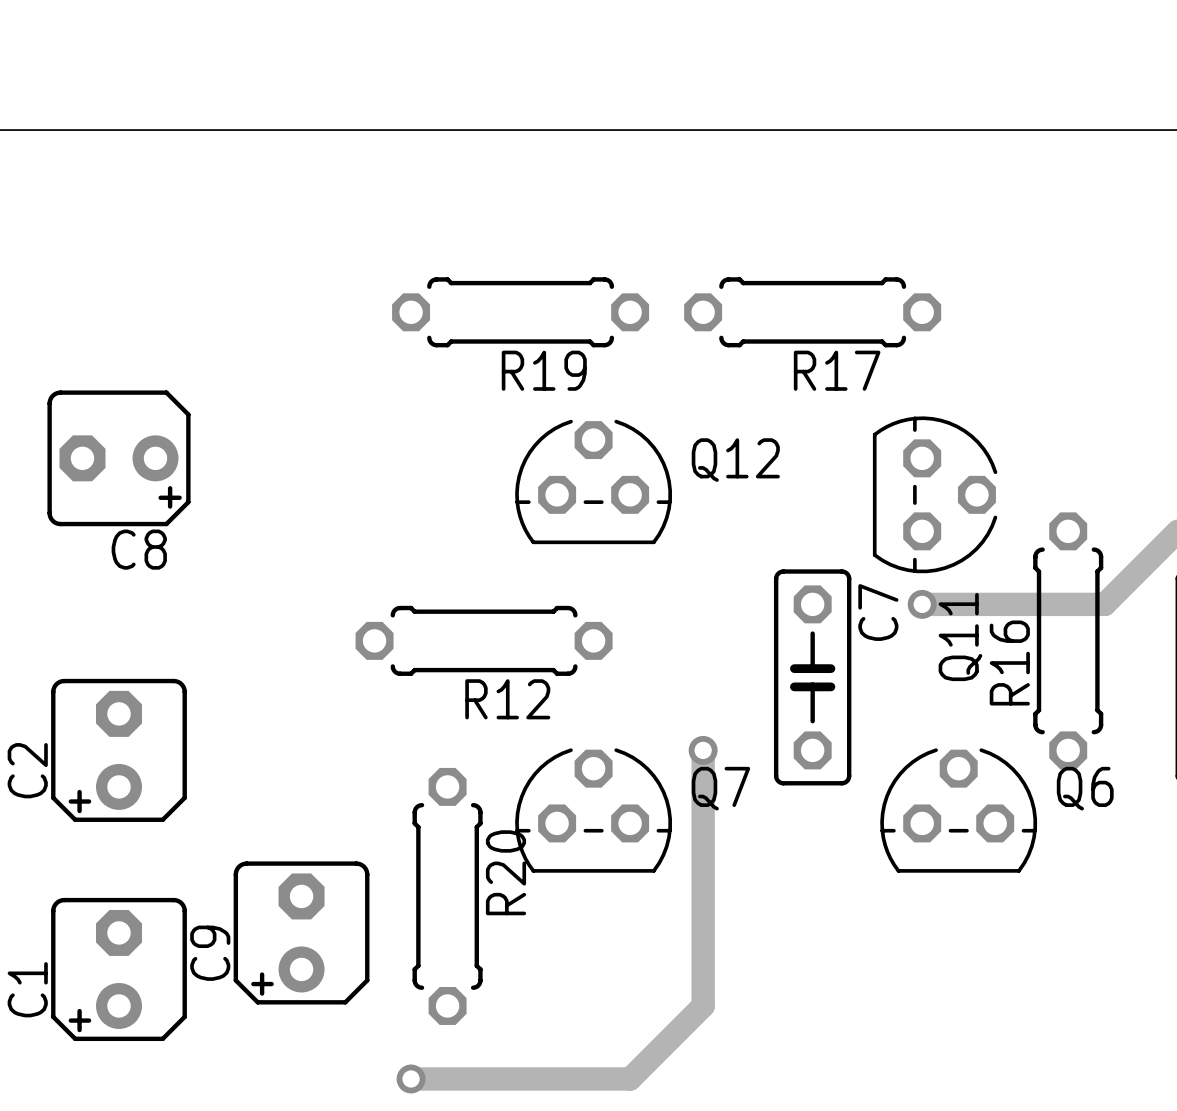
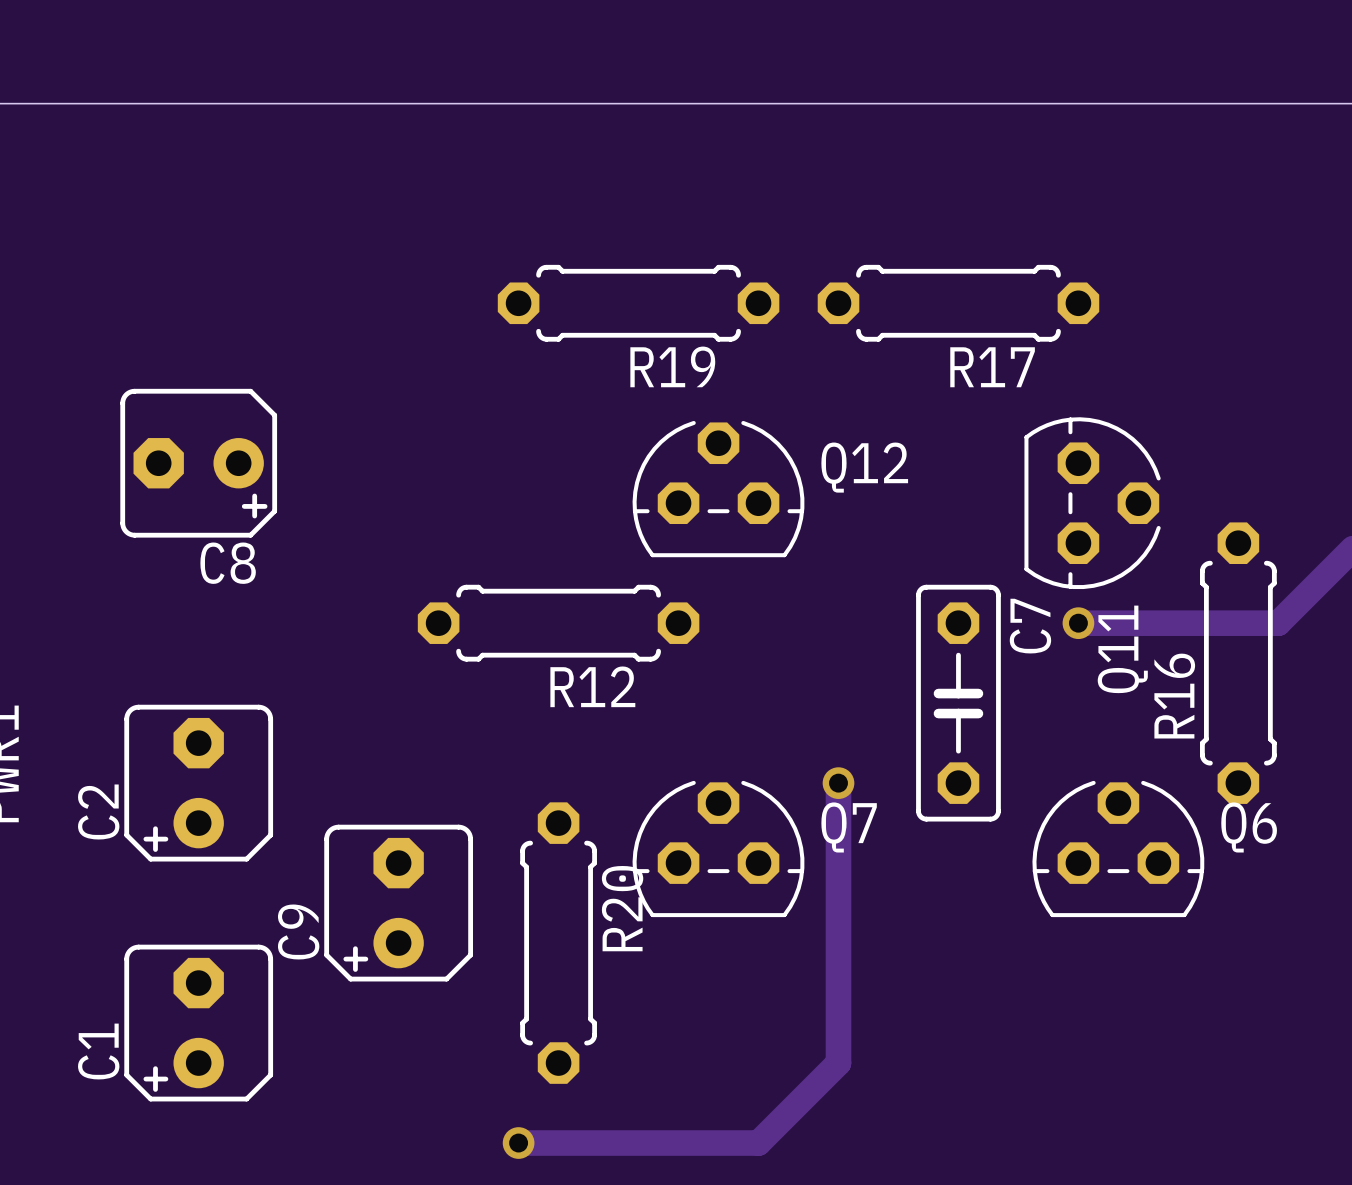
R12 position: (484, 640) -> (558, 623)
C9 position: (301, 932) -> (398, 903)

